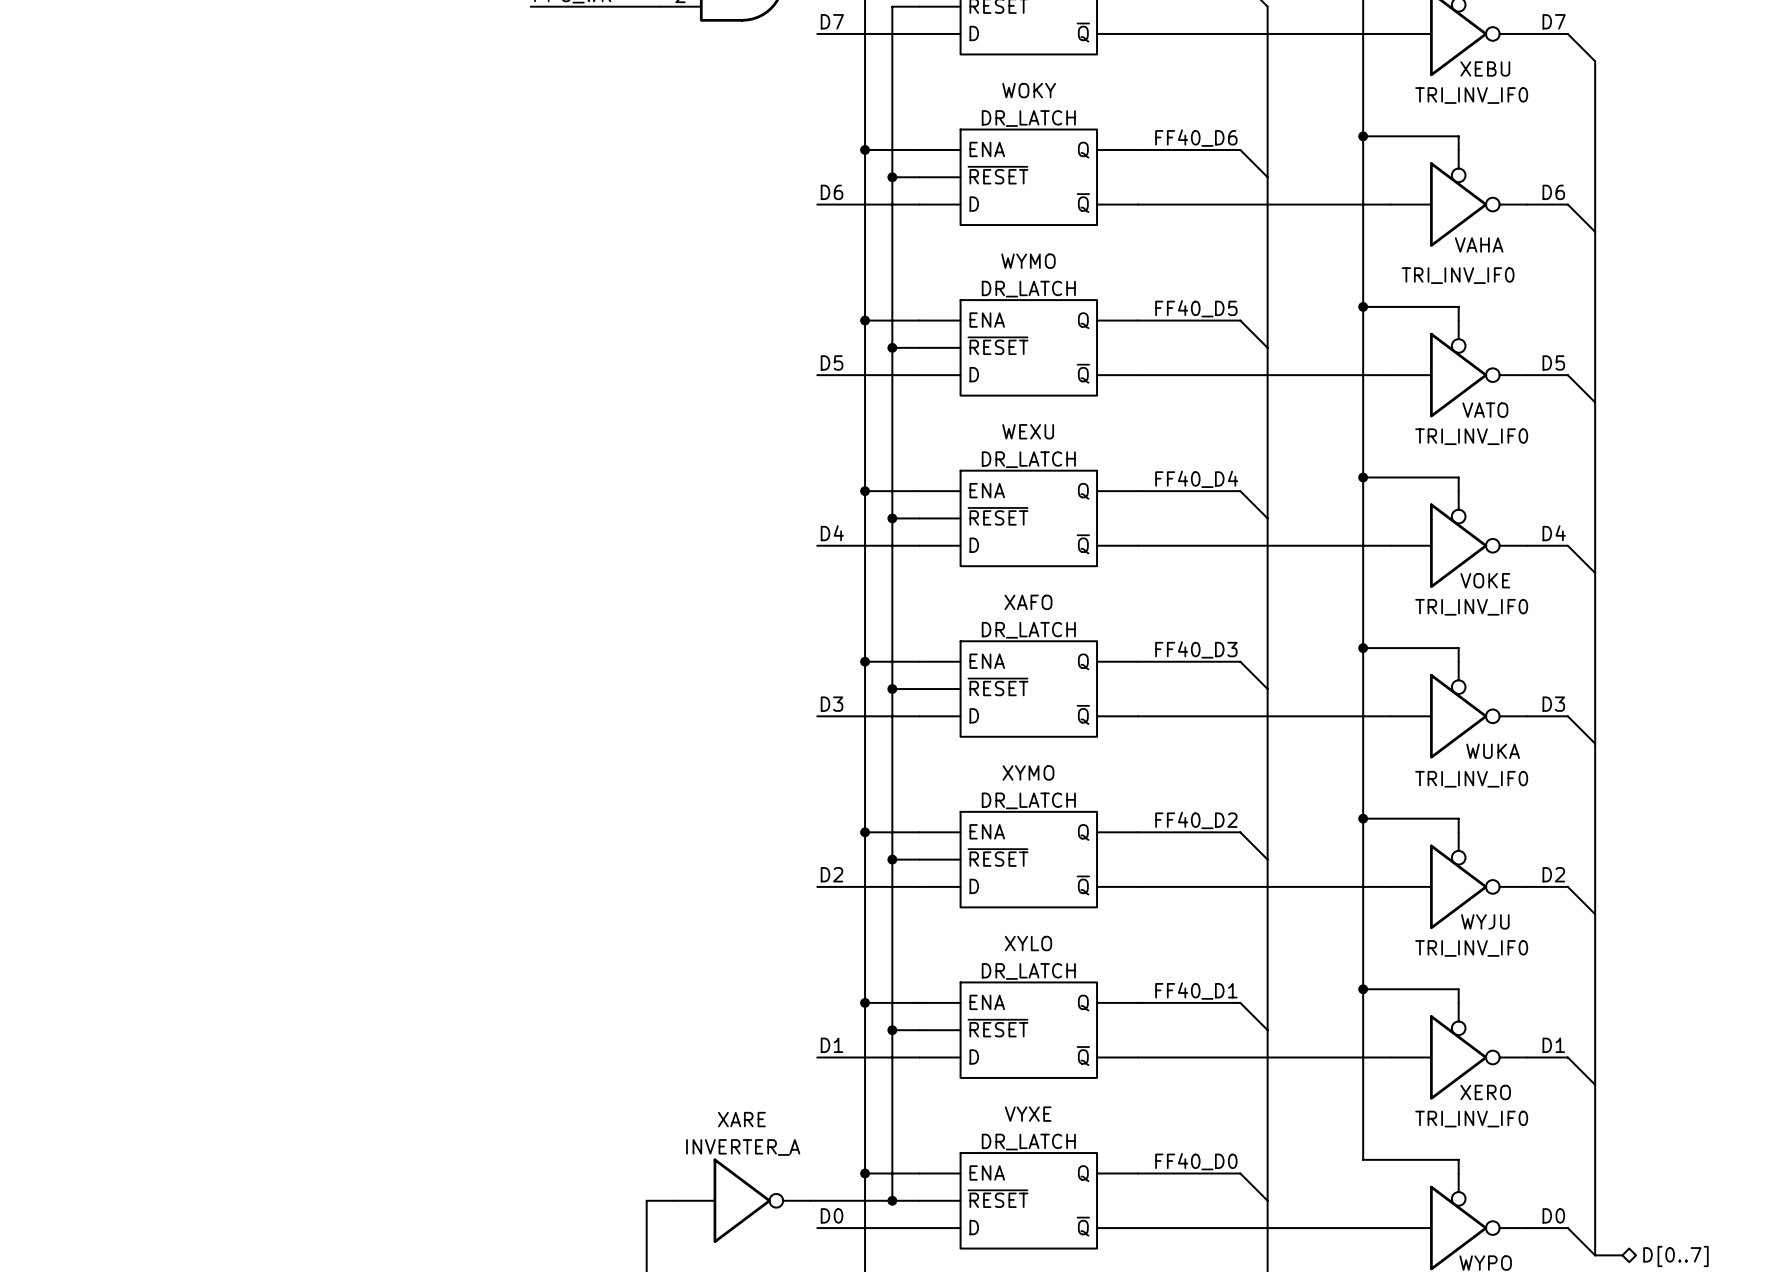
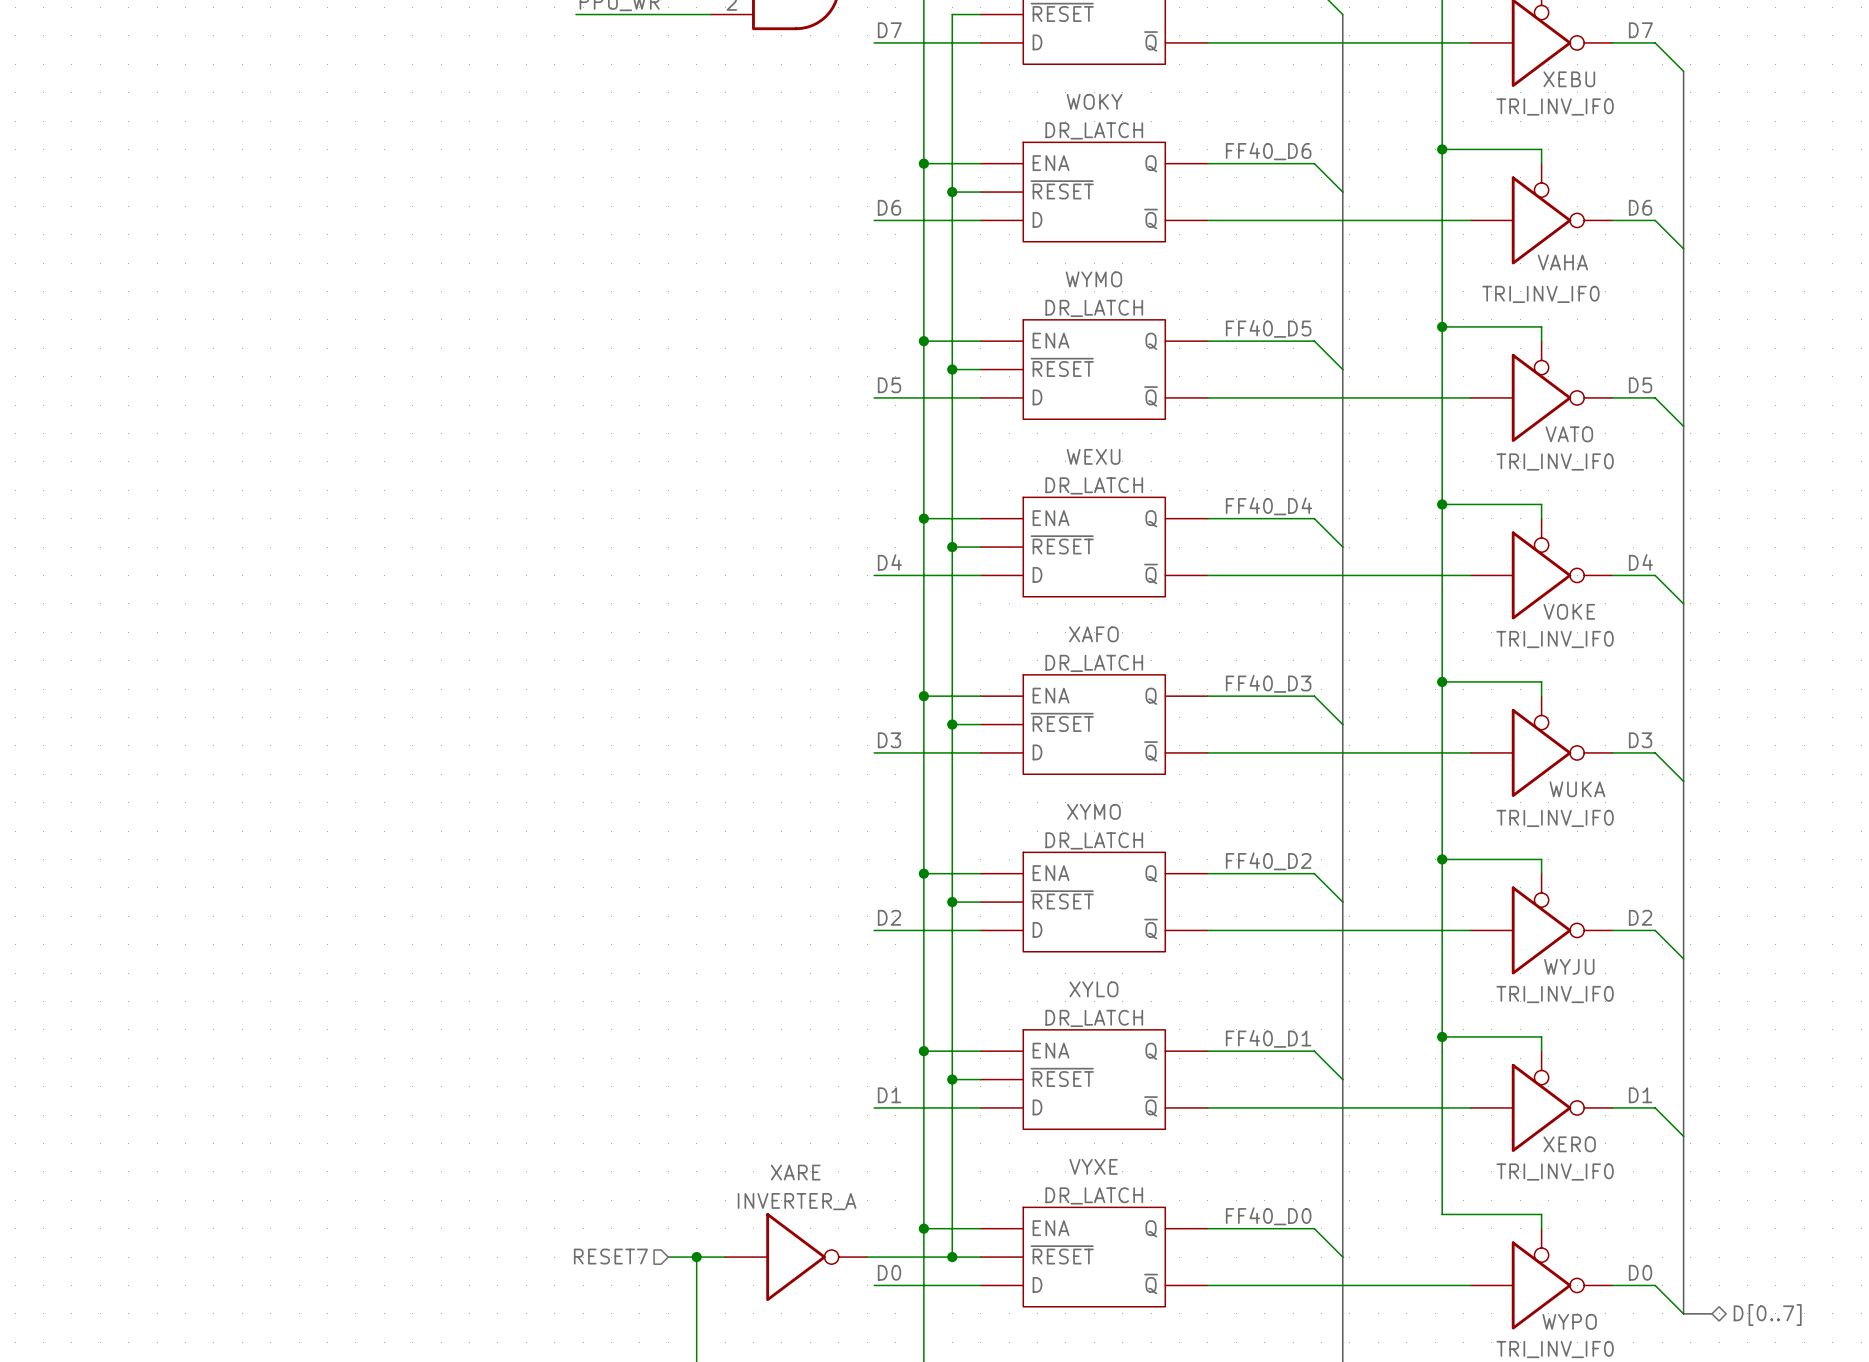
hierarchical label: none -> RESET7 (610, 1256)
wire: none -> (668, 1257) (696, 1257)
junction: none -> (696, 1257)

